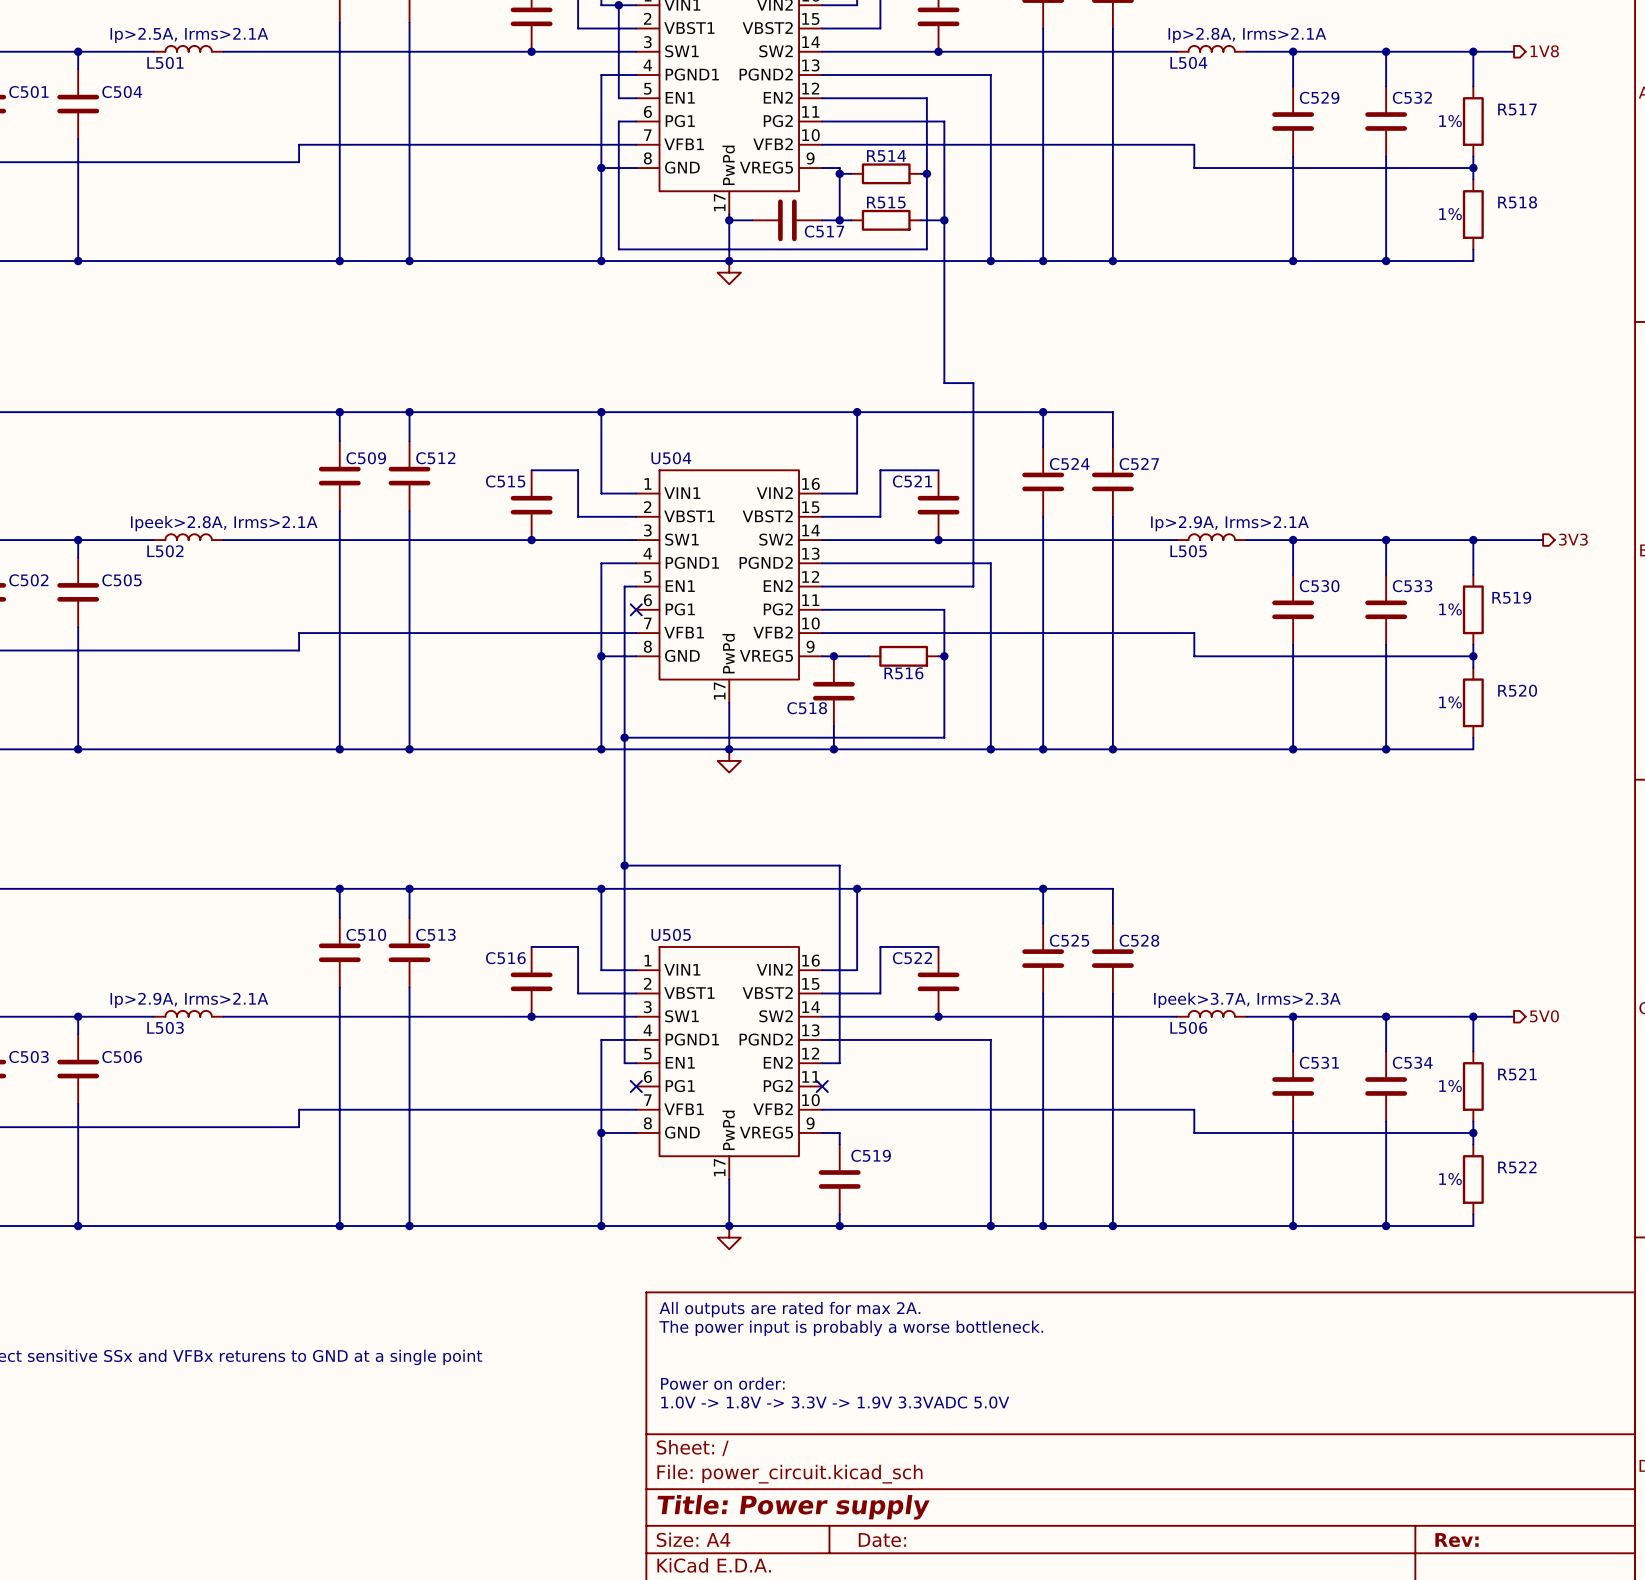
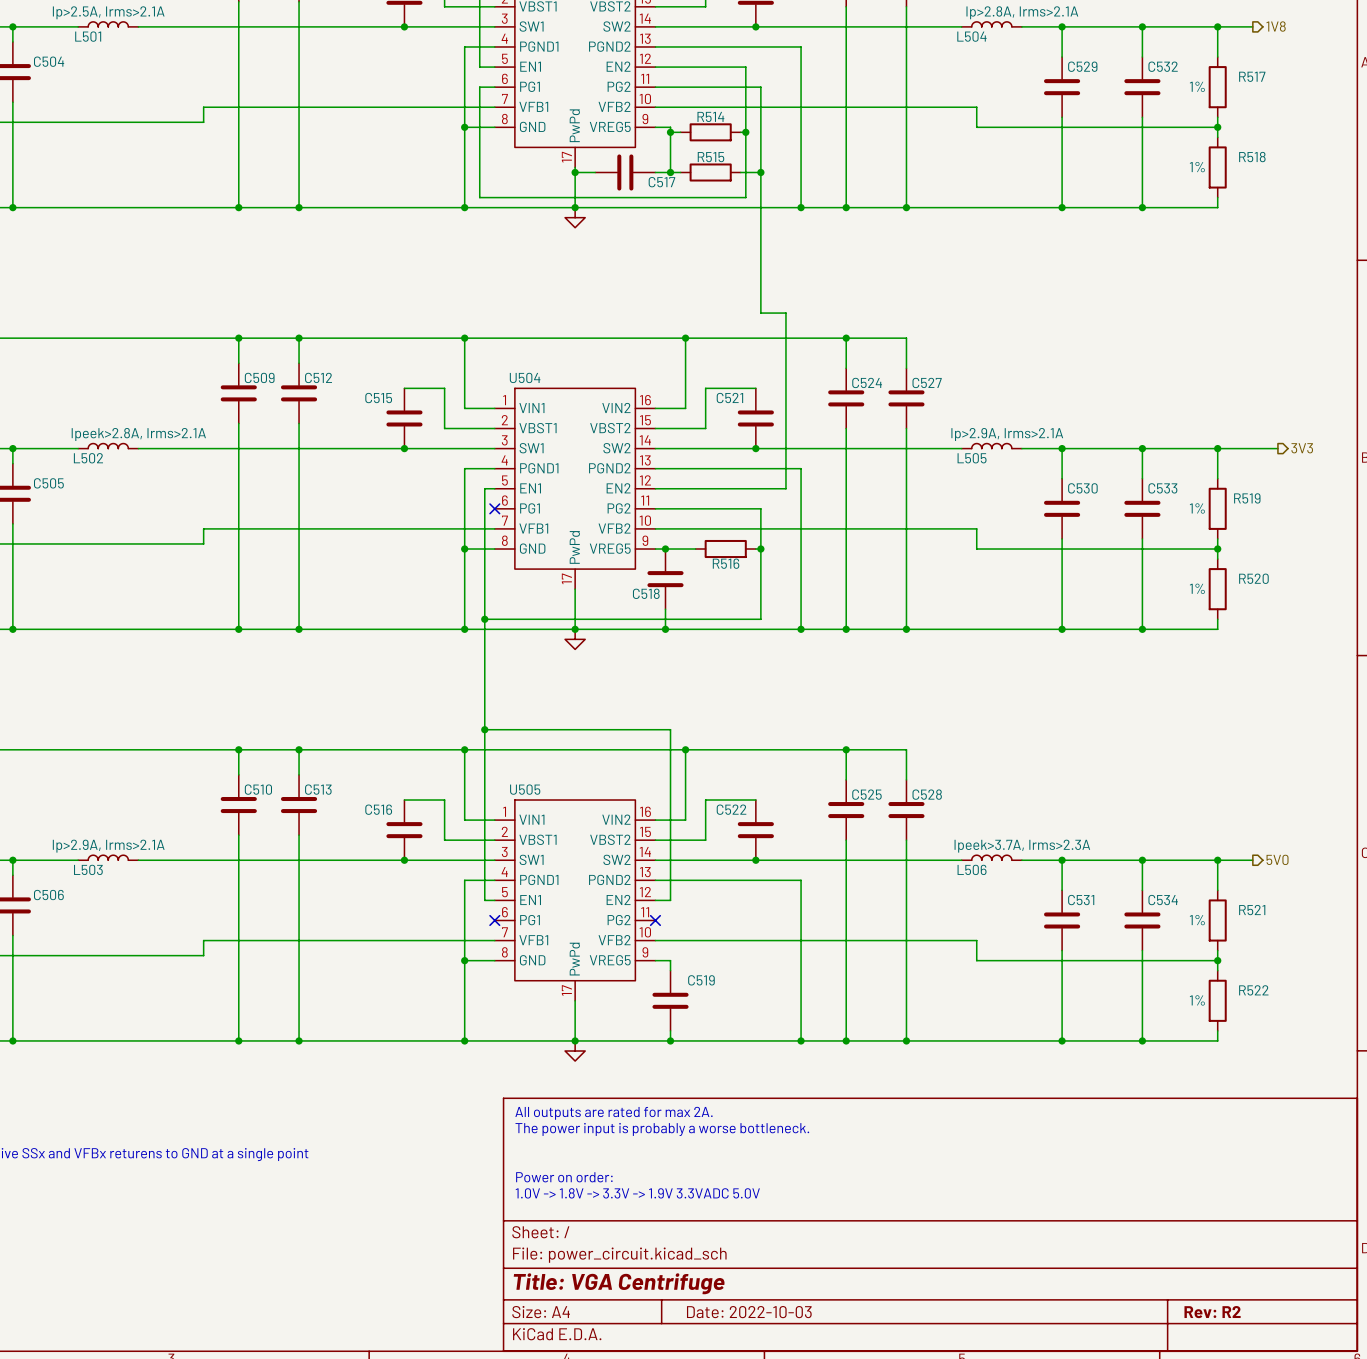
title block: Title: Power supply (793, 1507) -> Title: VGA Centrifuge (619, 1283)
title block: Date: (882, 1540) -> Date: 2022-10-03 (749, 1312)
title block: Rev: (1457, 1540) -> Rev: R2 (1212, 1312)

